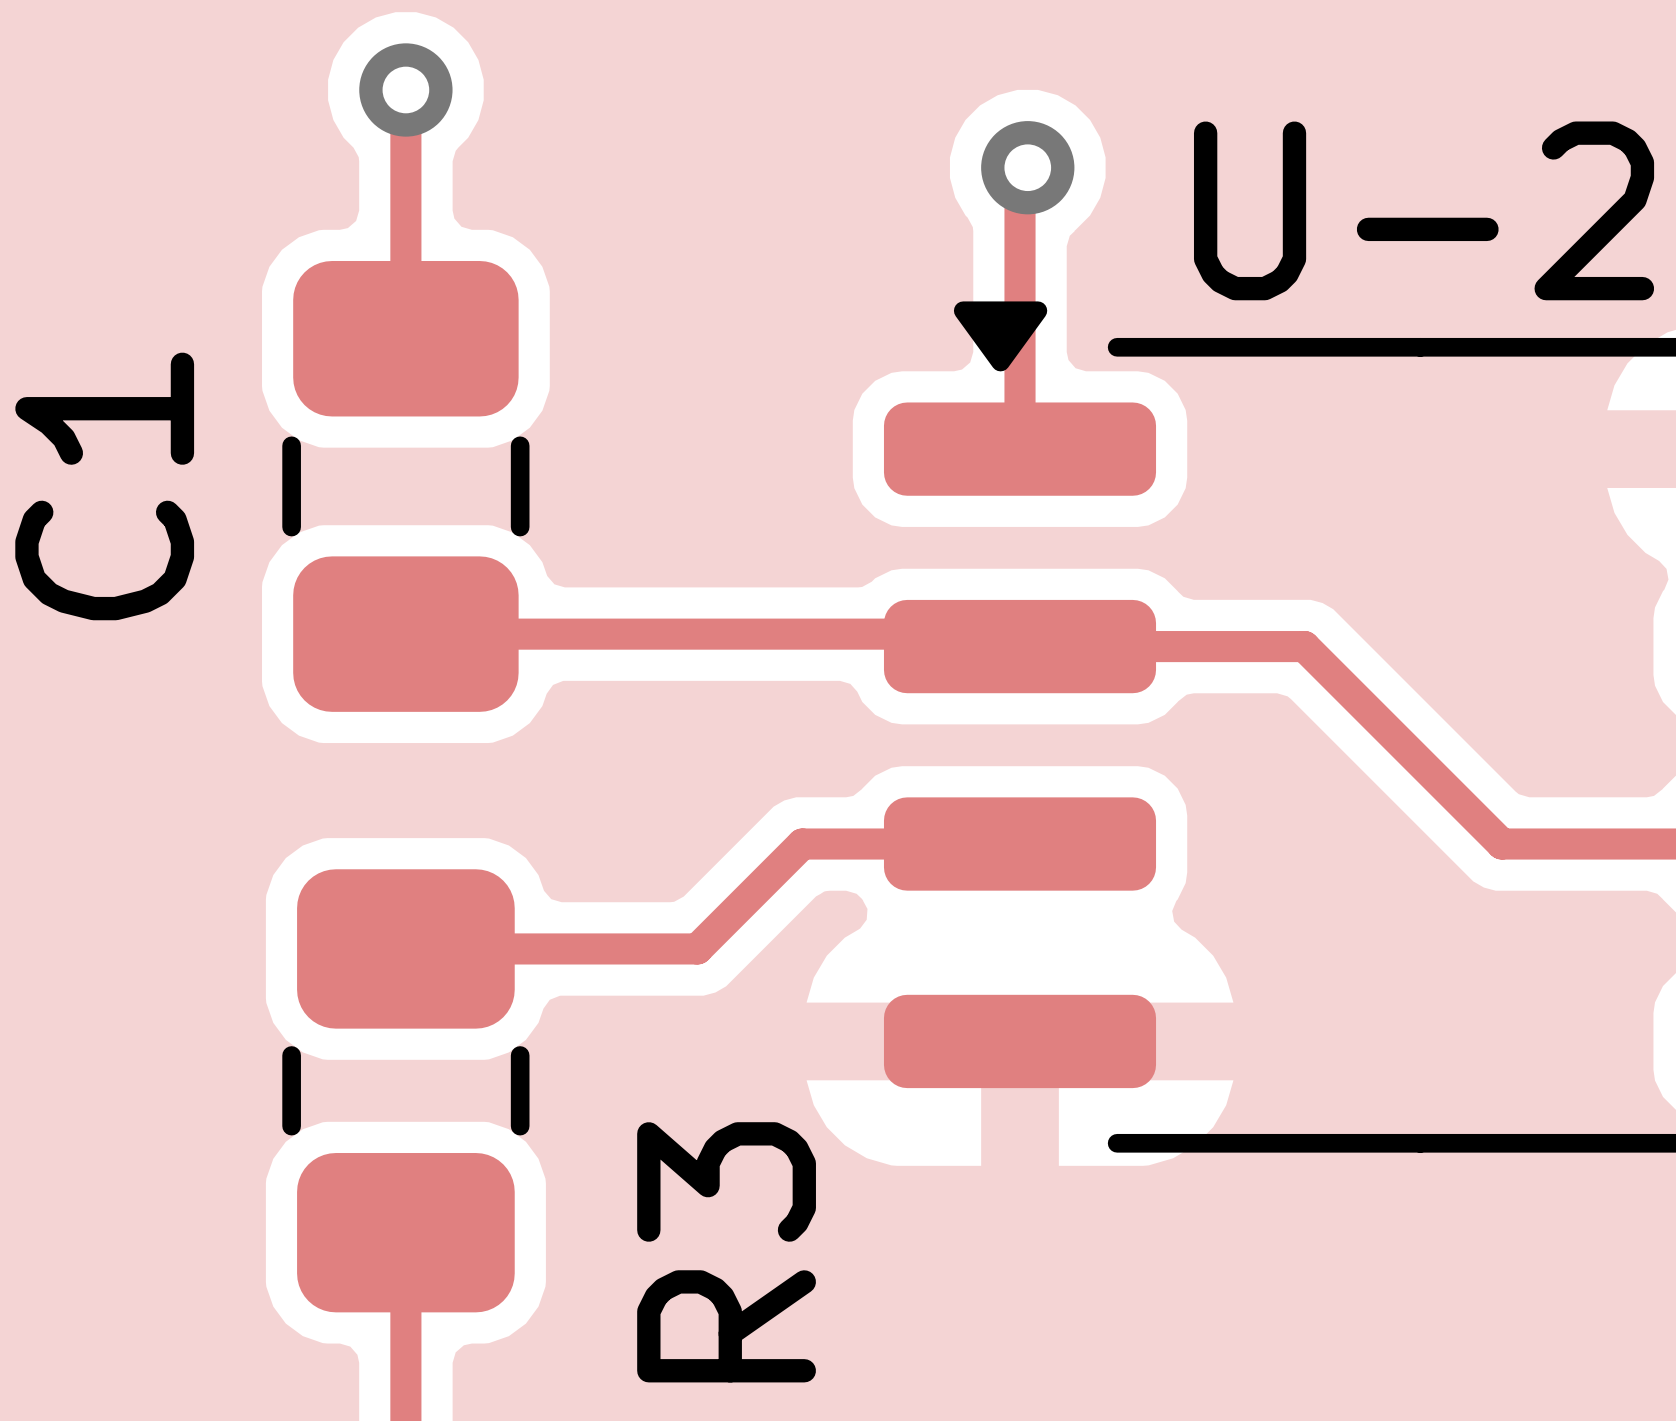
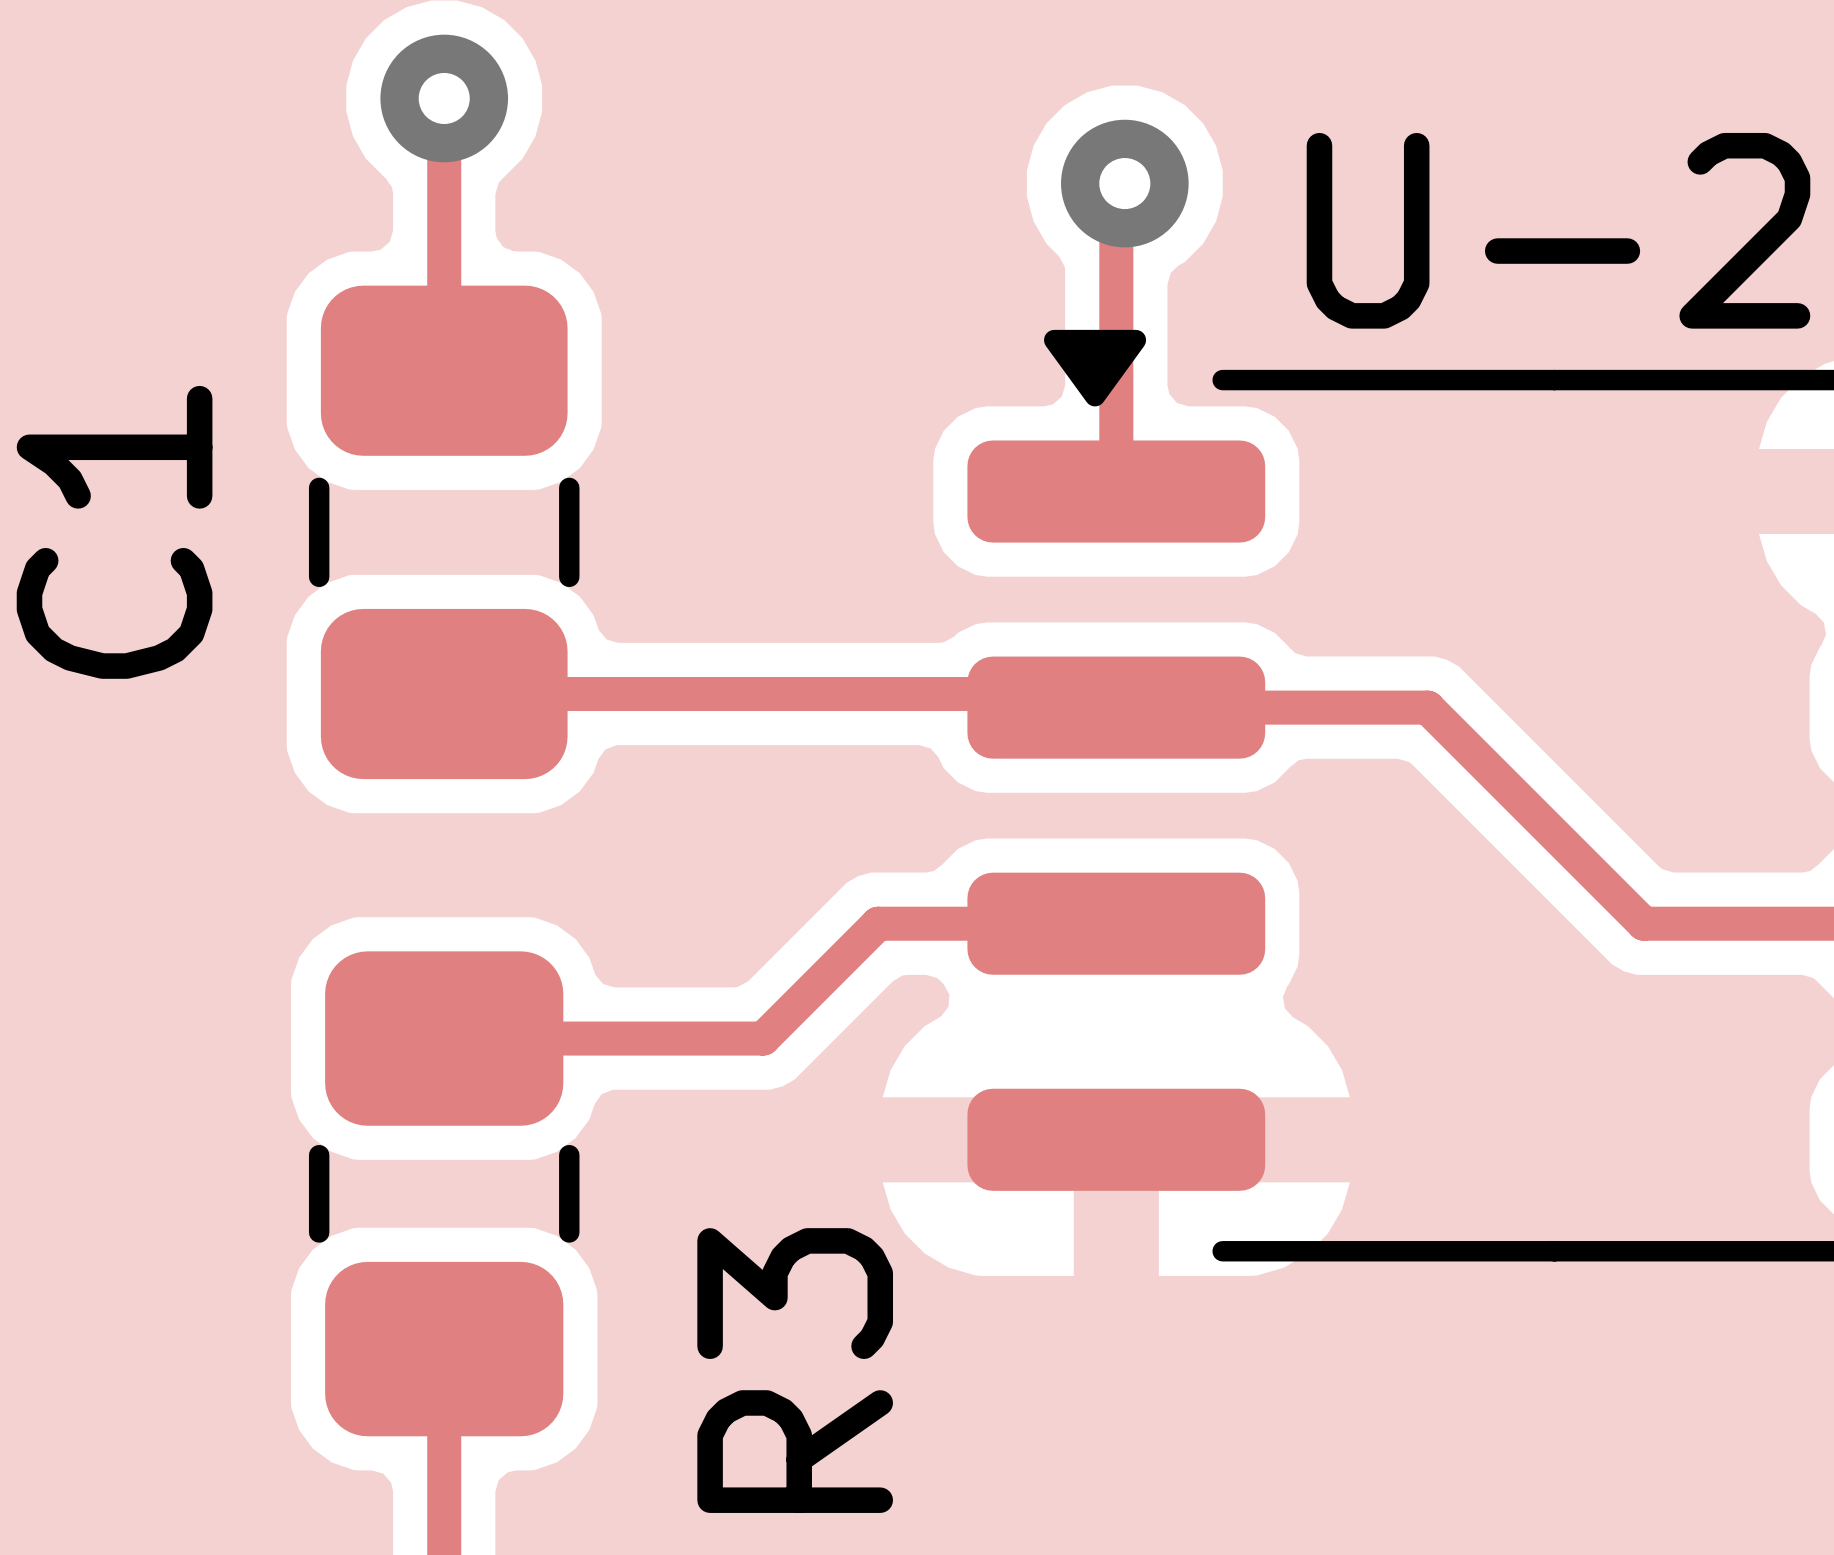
via size: [359, 43, 453, 137] -> [380, 34, 509, 163]
via size: [981, 121, 1075, 215] -> [1061, 119, 1189, 248]

